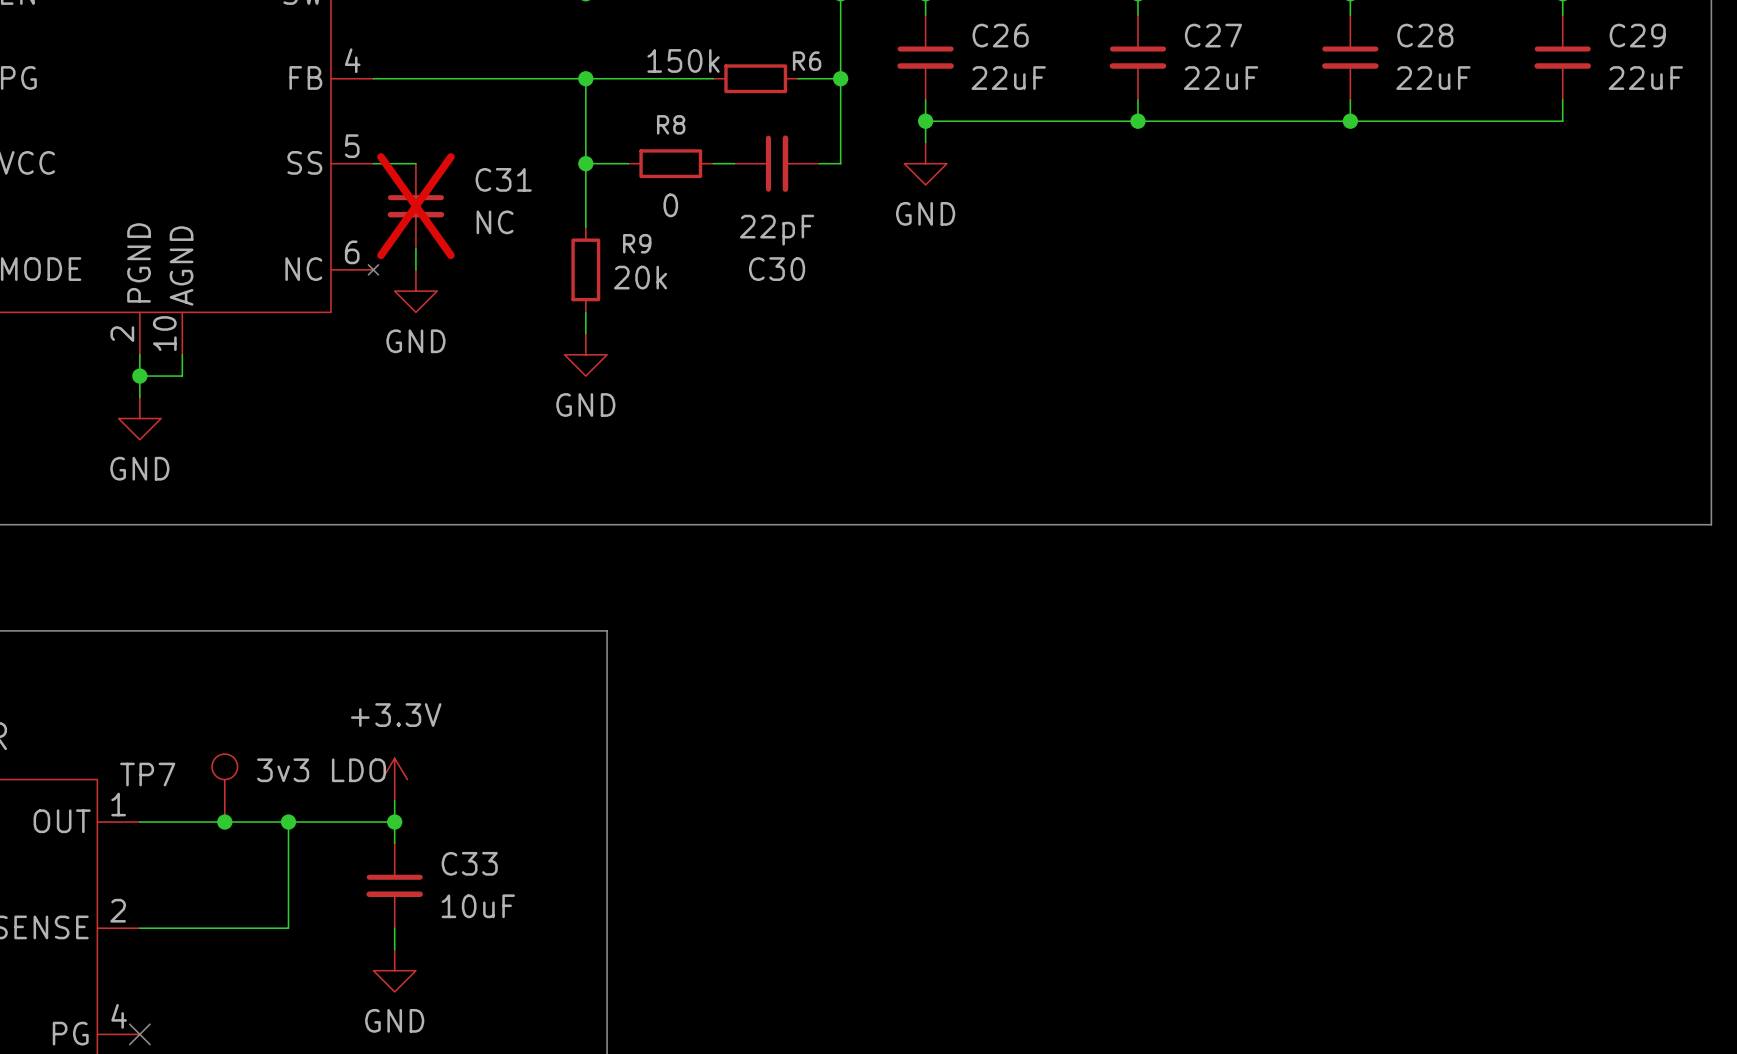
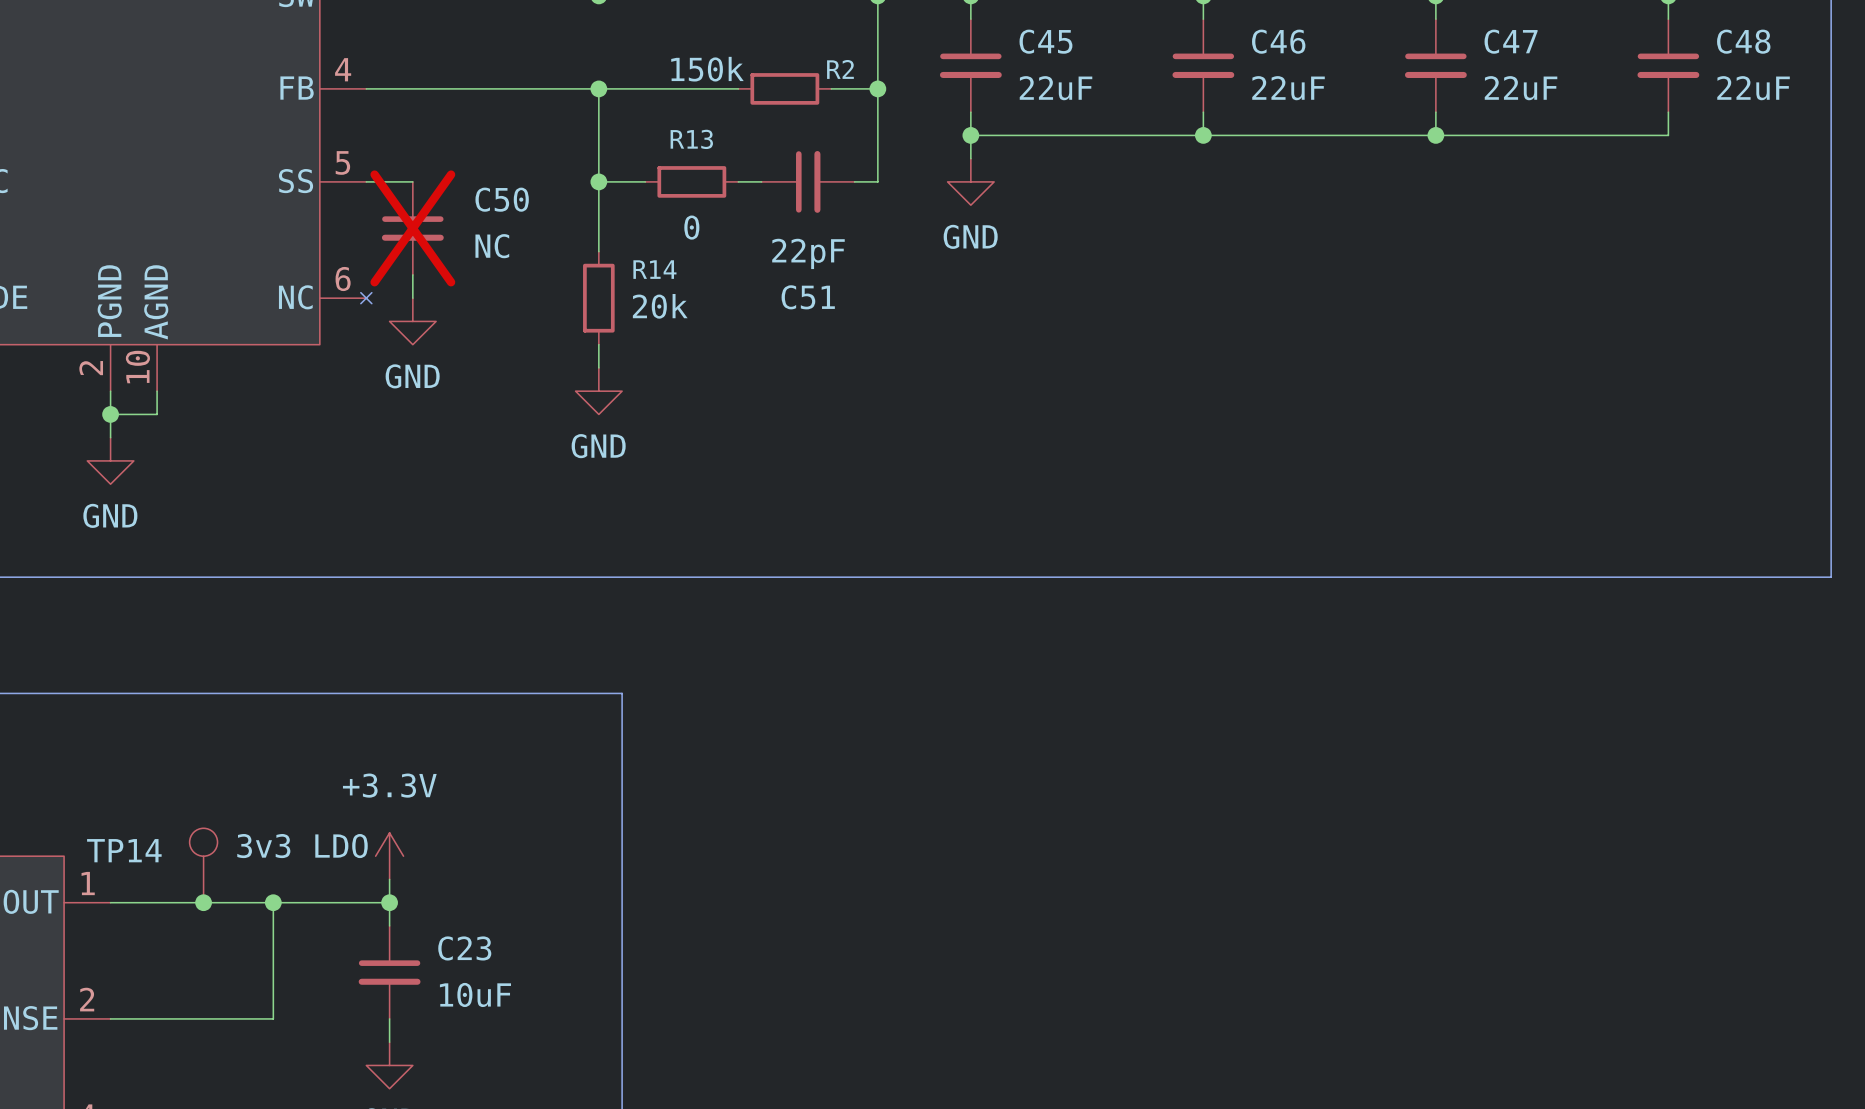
C26 name: C26 (1000, 35) -> C45 (1045, 41)
C27 name: C27 (1213, 35) -> C46 (1278, 41)
C28 name: C28 (1425, 35) -> C47 (1511, 41)
C29 name: C29 (1637, 35) -> C48 (1743, 41)
R6 name: R6 (807, 61) -> R2 (840, 69)
R8 name: R8 (671, 124) -> R13 (691, 139)
C31 name: C31 (503, 179) -> C50 (502, 199)
R9 name: R9 (637, 243) -> R14 (654, 269)
C30 name: C30 (777, 269) -> C51 (808, 297)
TP7 name: TP7 (147, 774) -> TP14 (124, 850)
C33 name: C33 (469, 863) -> C23 (464, 948)

